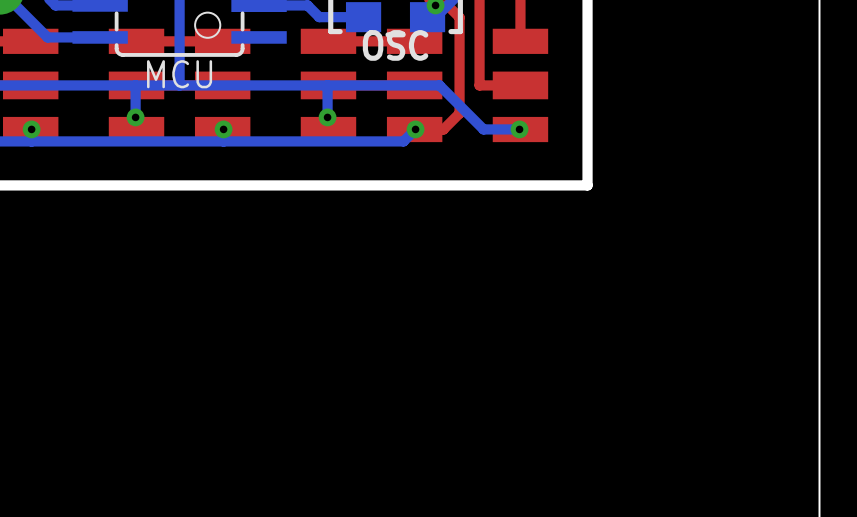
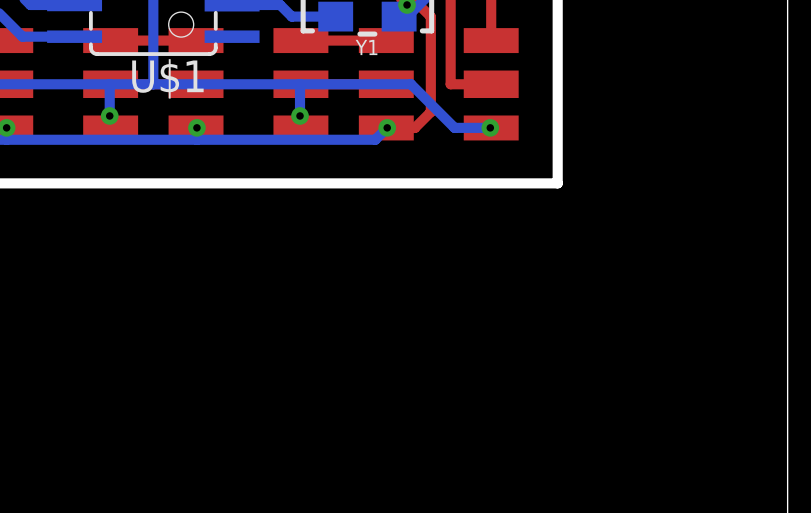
OSC name: OSC (395, 45) -> Y1 (366, 47)
MCU name: MCU (179, 74) -> U$1 (167, 78)

